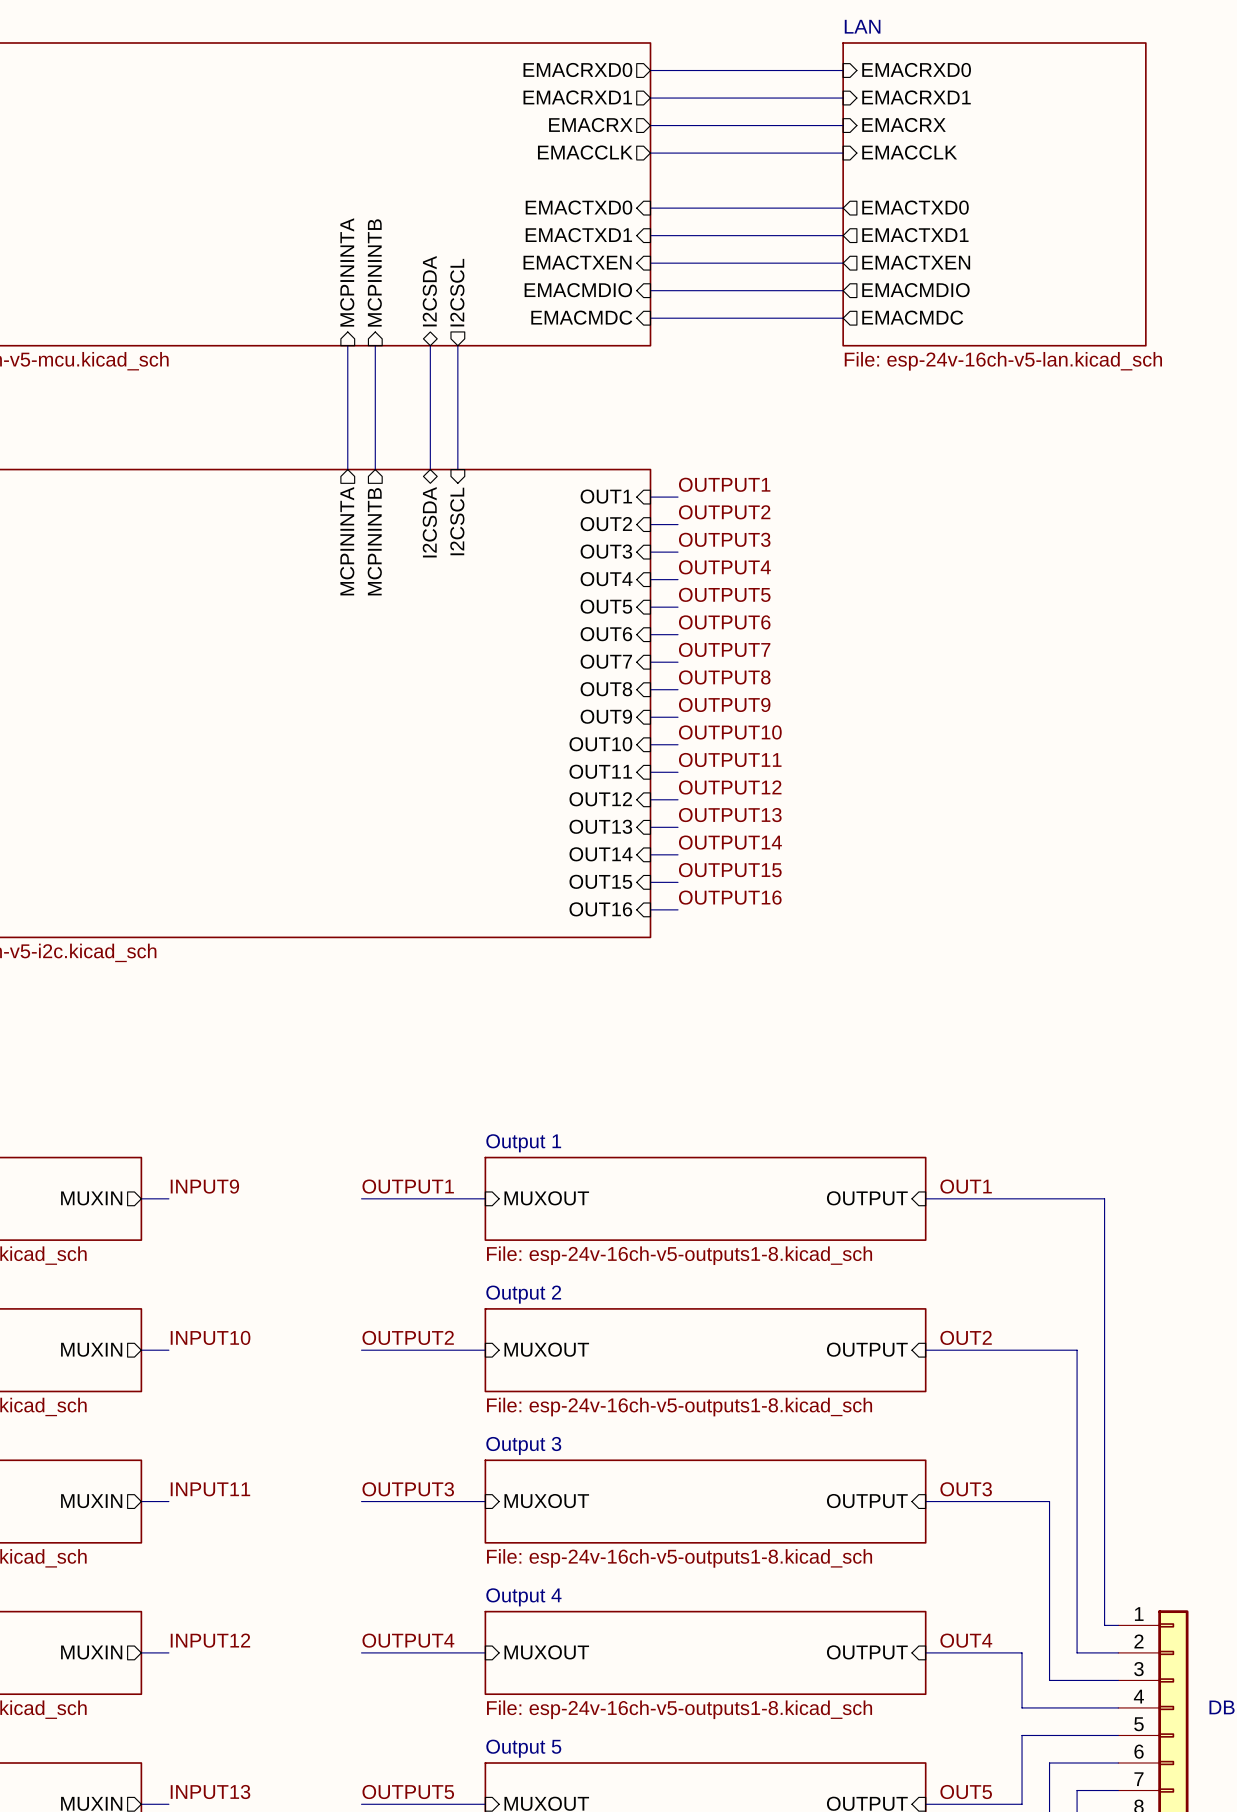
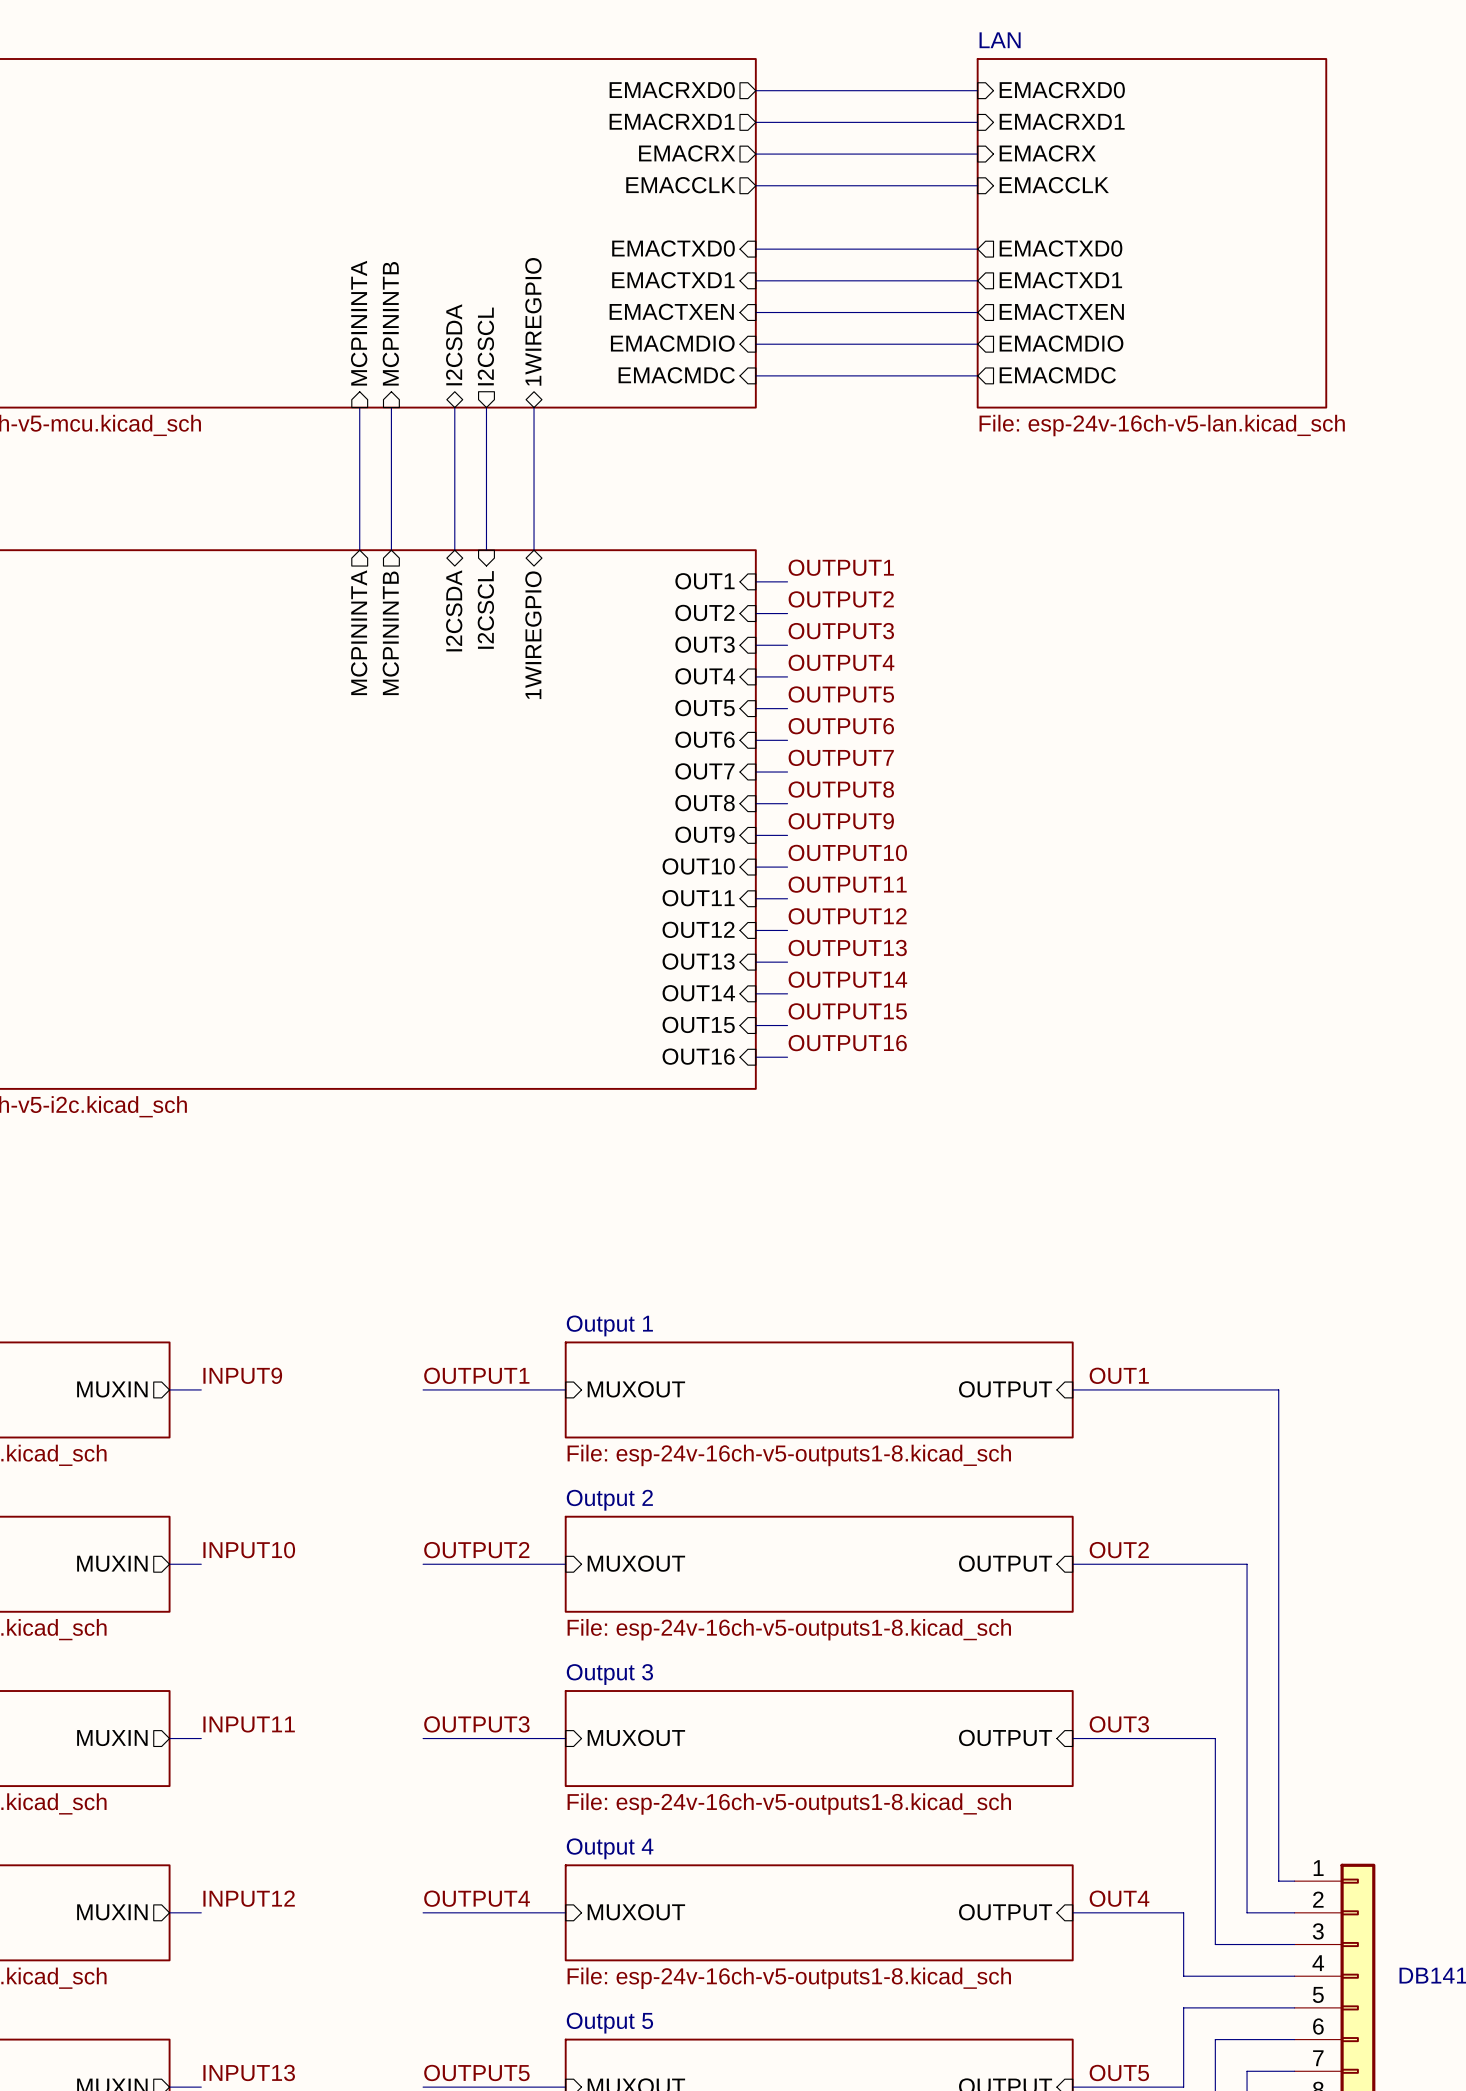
sheet pin position: MCPININTA (347, 272) -> MCPININTA (359, 323)
sheet pin position: MCPININTB (374, 272) -> MCPININTB (390, 323)
sheet pin position: I2CSDA (429, 291) -> I2CSDA (454, 344)
sheet pin: none -> I2CSCL (485, 346)
sheet pin shape: output (457, 292) -> bidirectional (533, 321)
sheet pin: I2CSCL (457, 292) -> 1WIREGPIO (533, 321)
wire: (347, 345) (347, 469) -> (359, 407) (359, 550)
wire: (375, 345) (375, 469) -> (391, 407) (391, 550)
wire: none -> (486, 407) (486, 550)
wire: (430, 345) (430, 469) -> (454, 407) (454, 550)
sheet pin: none -> I2CSCL (485, 609)
sheet pin shape: input (457, 521) -> bidirectional (533, 635)
sheet pin: I2CSCL (457, 521) -> 1WIREGPIO (533, 635)
sheet pin position: I2CSDA (429, 522) -> I2CSDA (454, 610)
sheet pin position: MCPININTA (347, 541) -> MCPININTA (359, 632)
sheet pin position: MCPININTB (374, 541) -> MCPININTB (390, 633)

